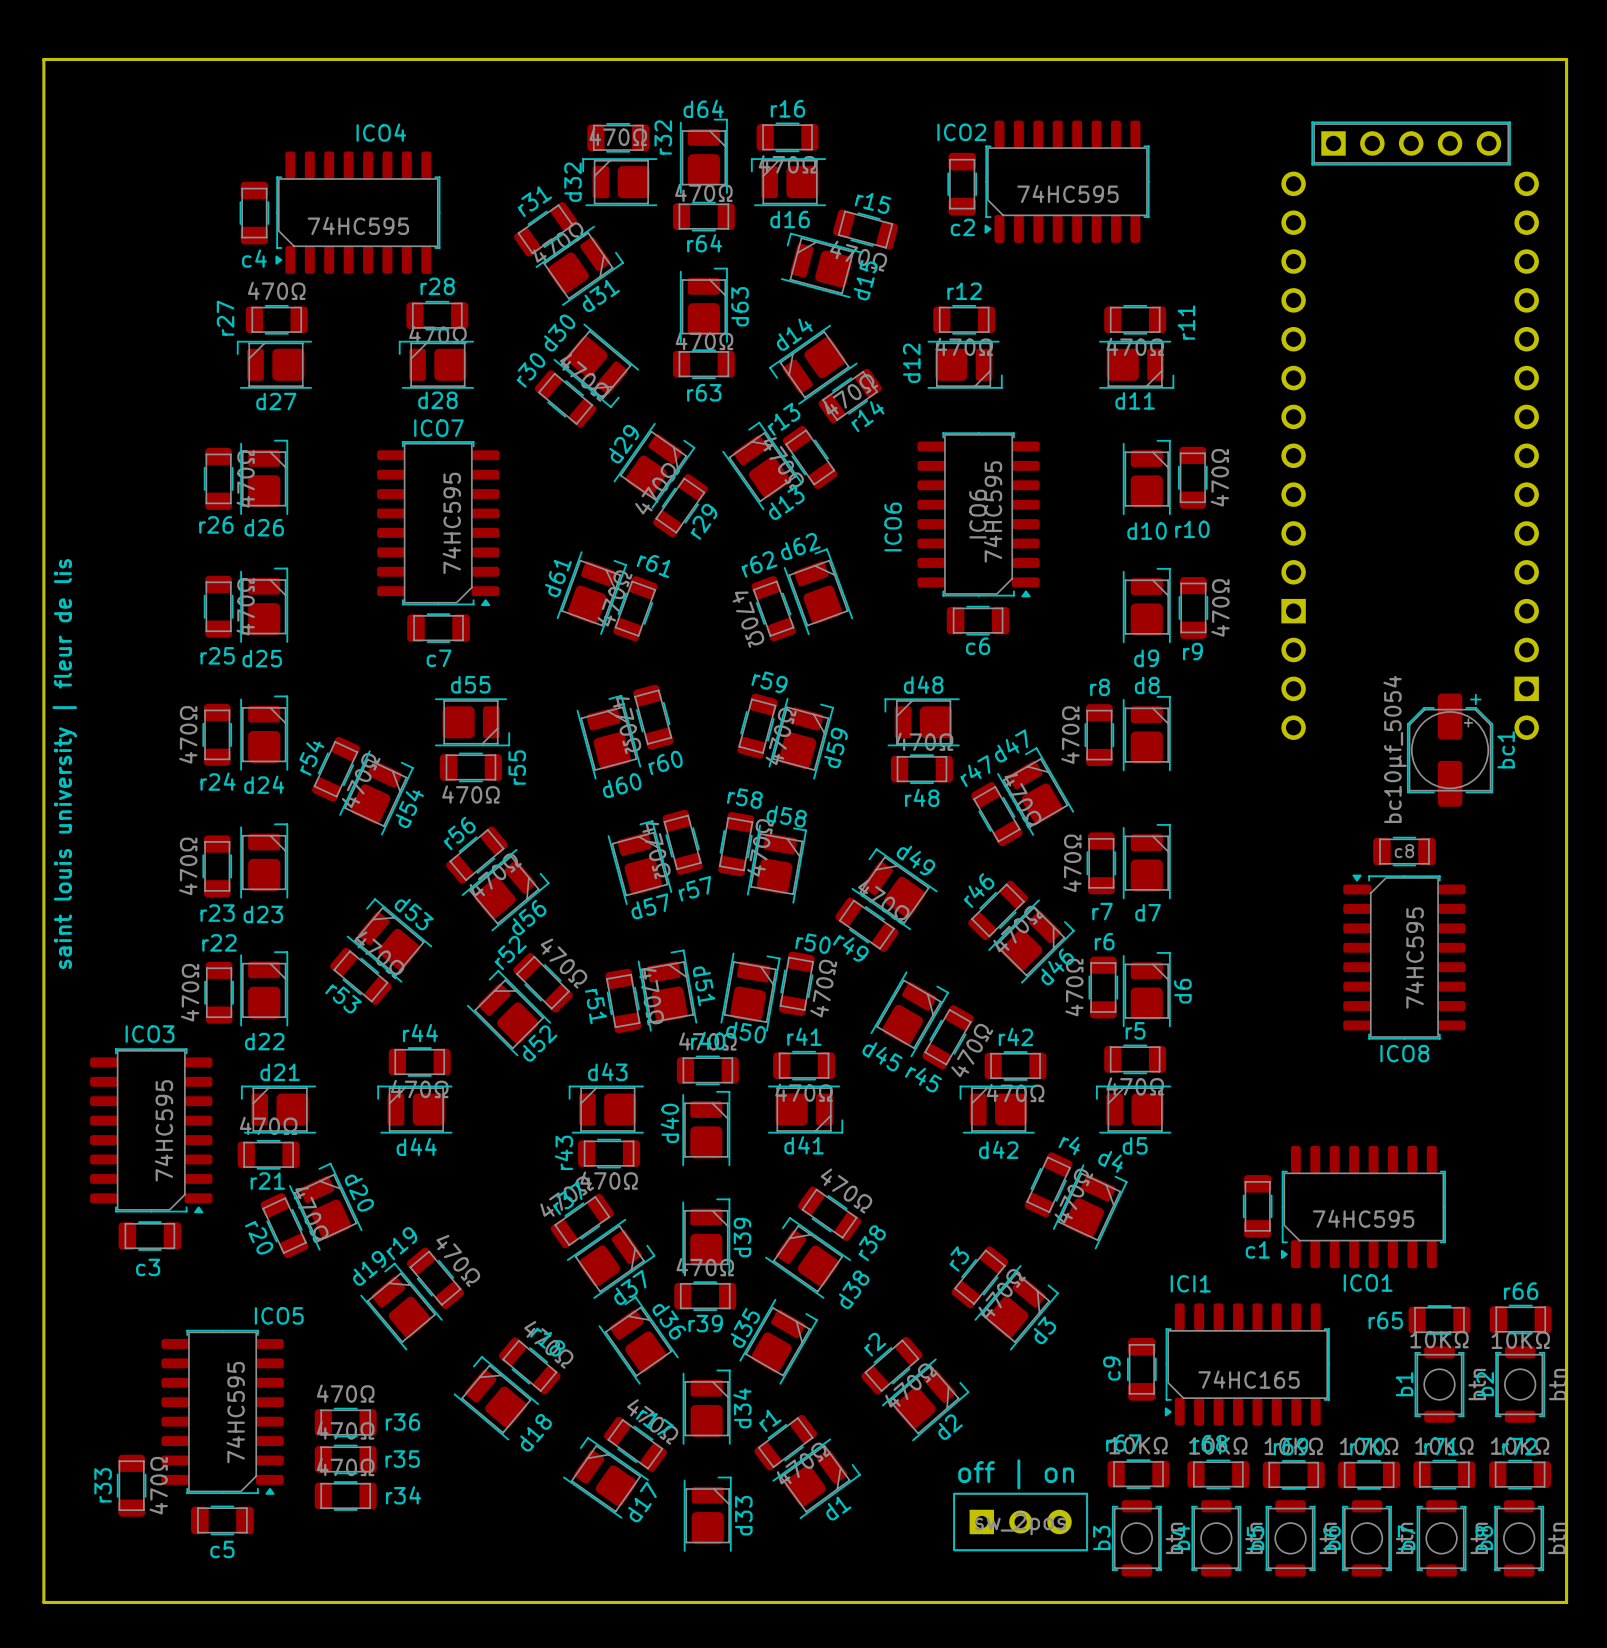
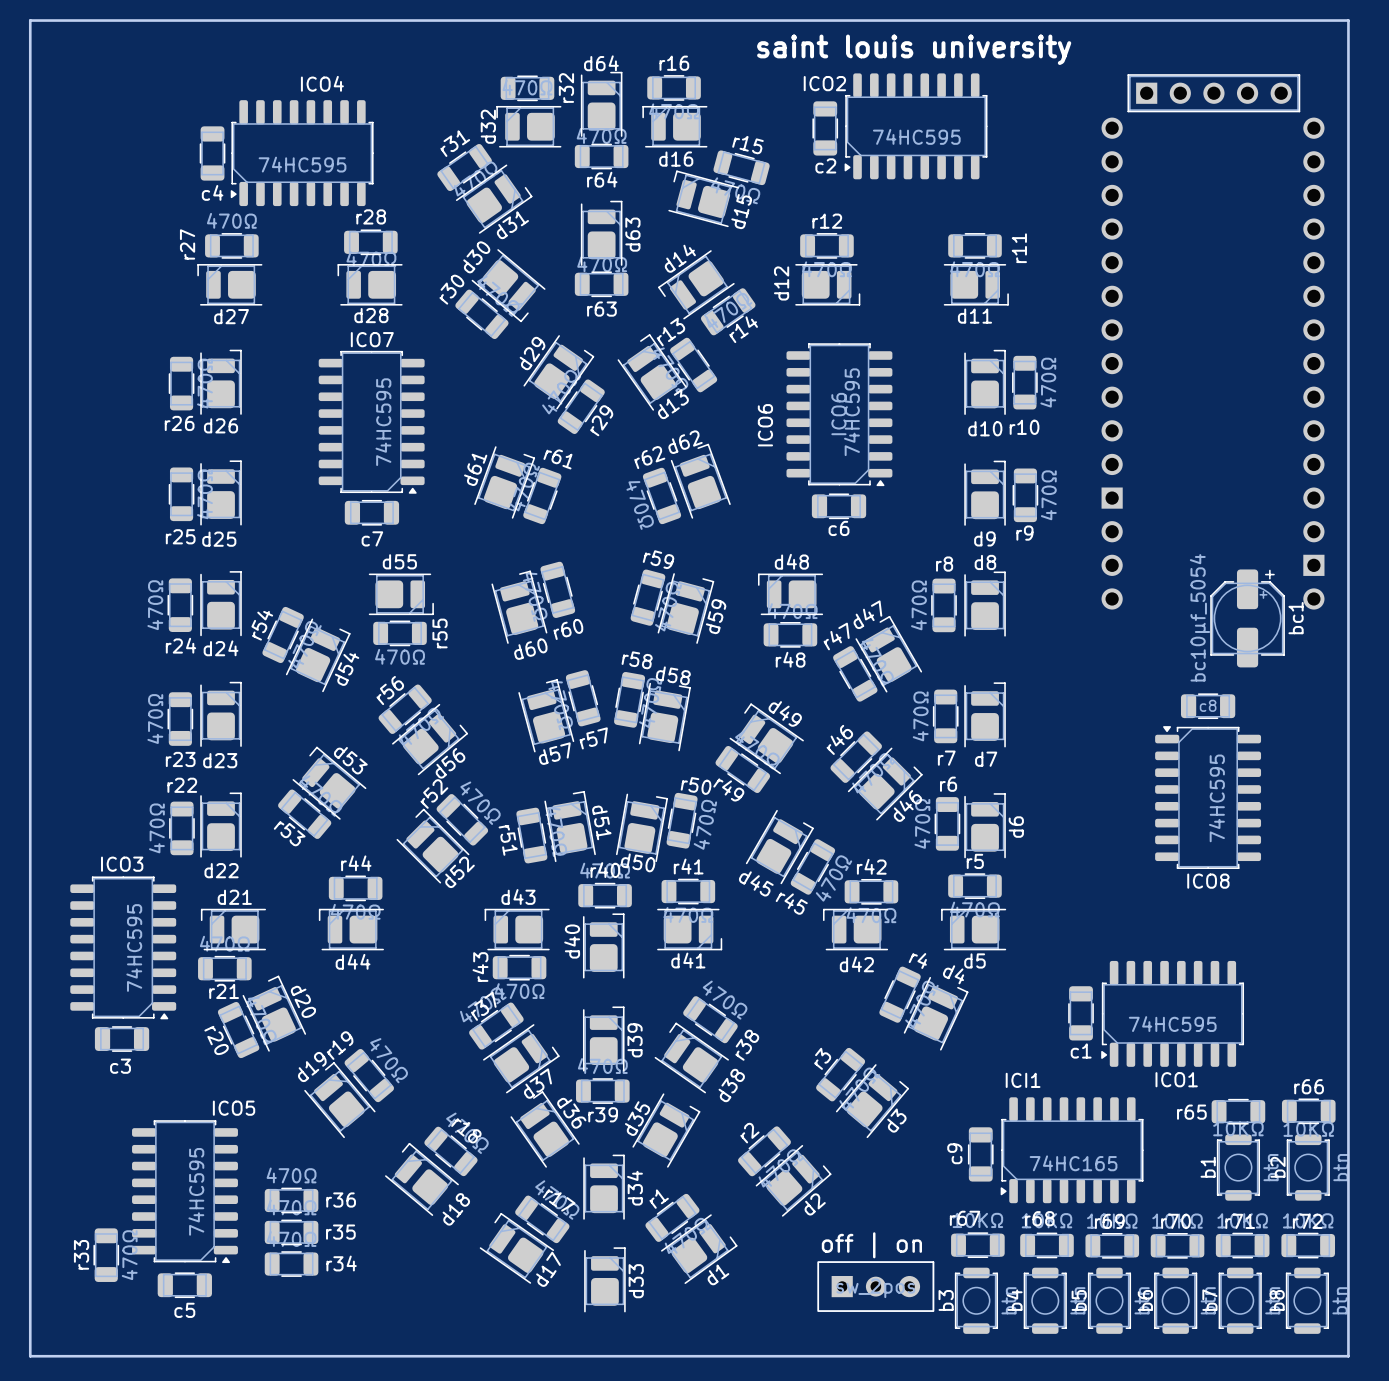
text: none -> saint louis university (914, 49)
text: saint louis university | fleur de lis (64, 764) -> none

